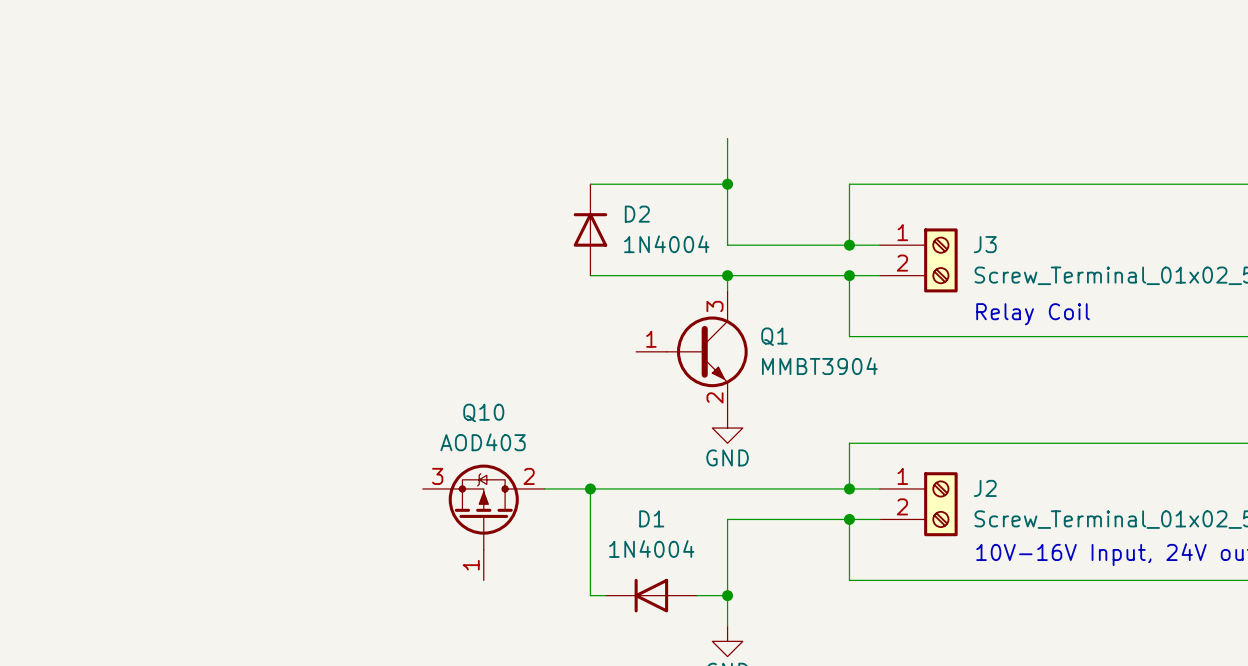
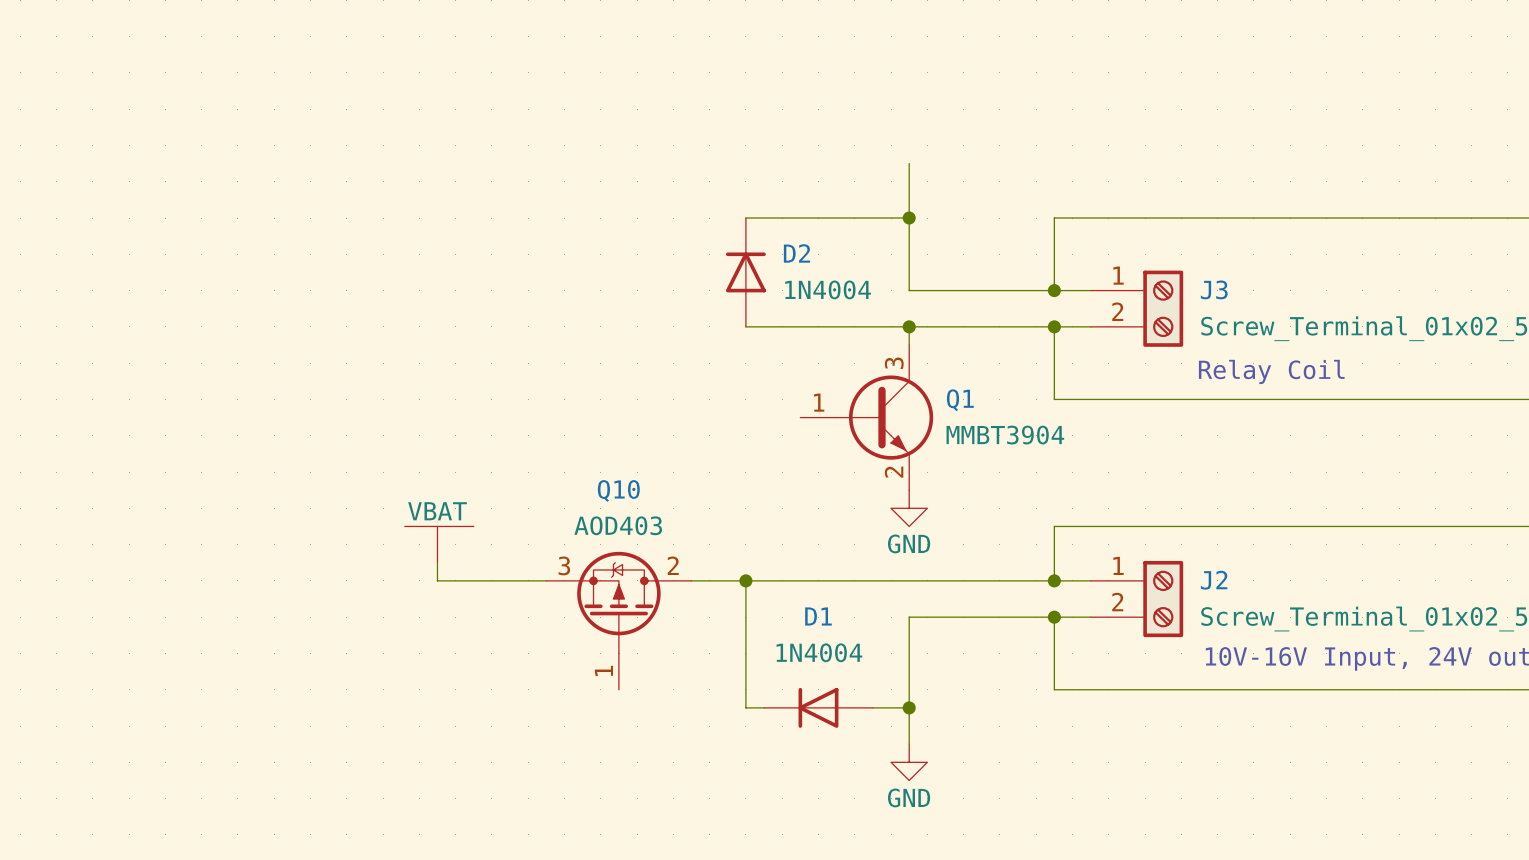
power symbol: none -> VBAT (439, 544)
wire: none -> (437, 562) (437, 580) (546, 580)

